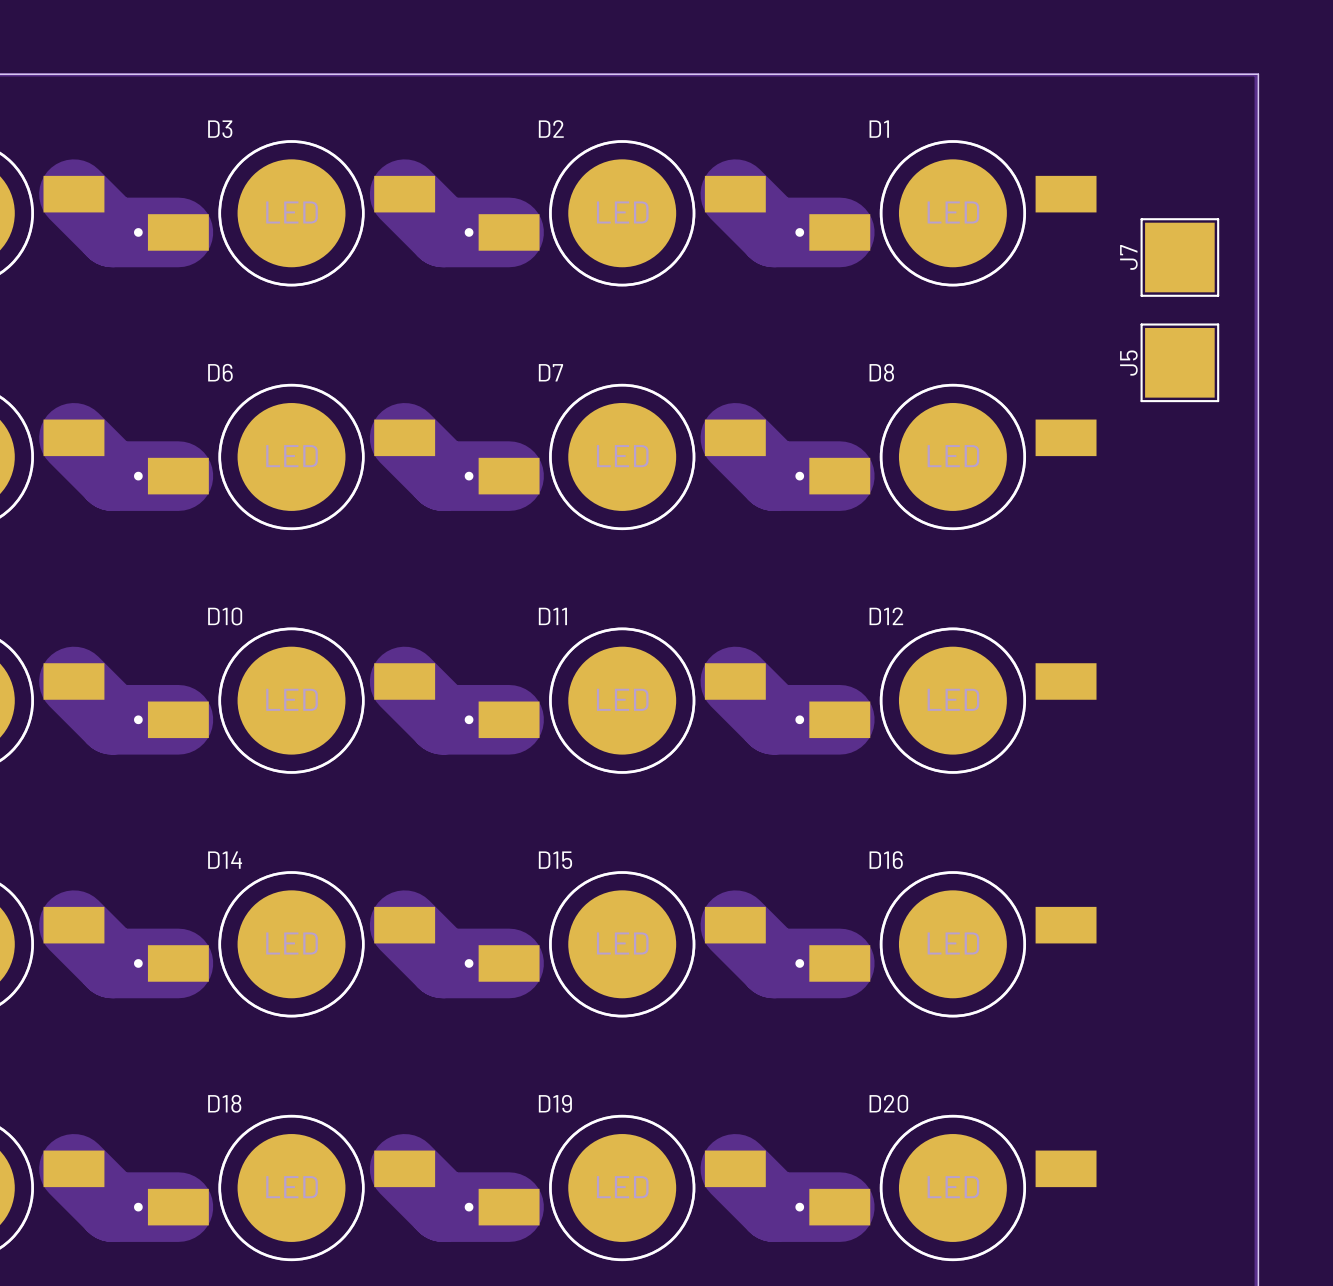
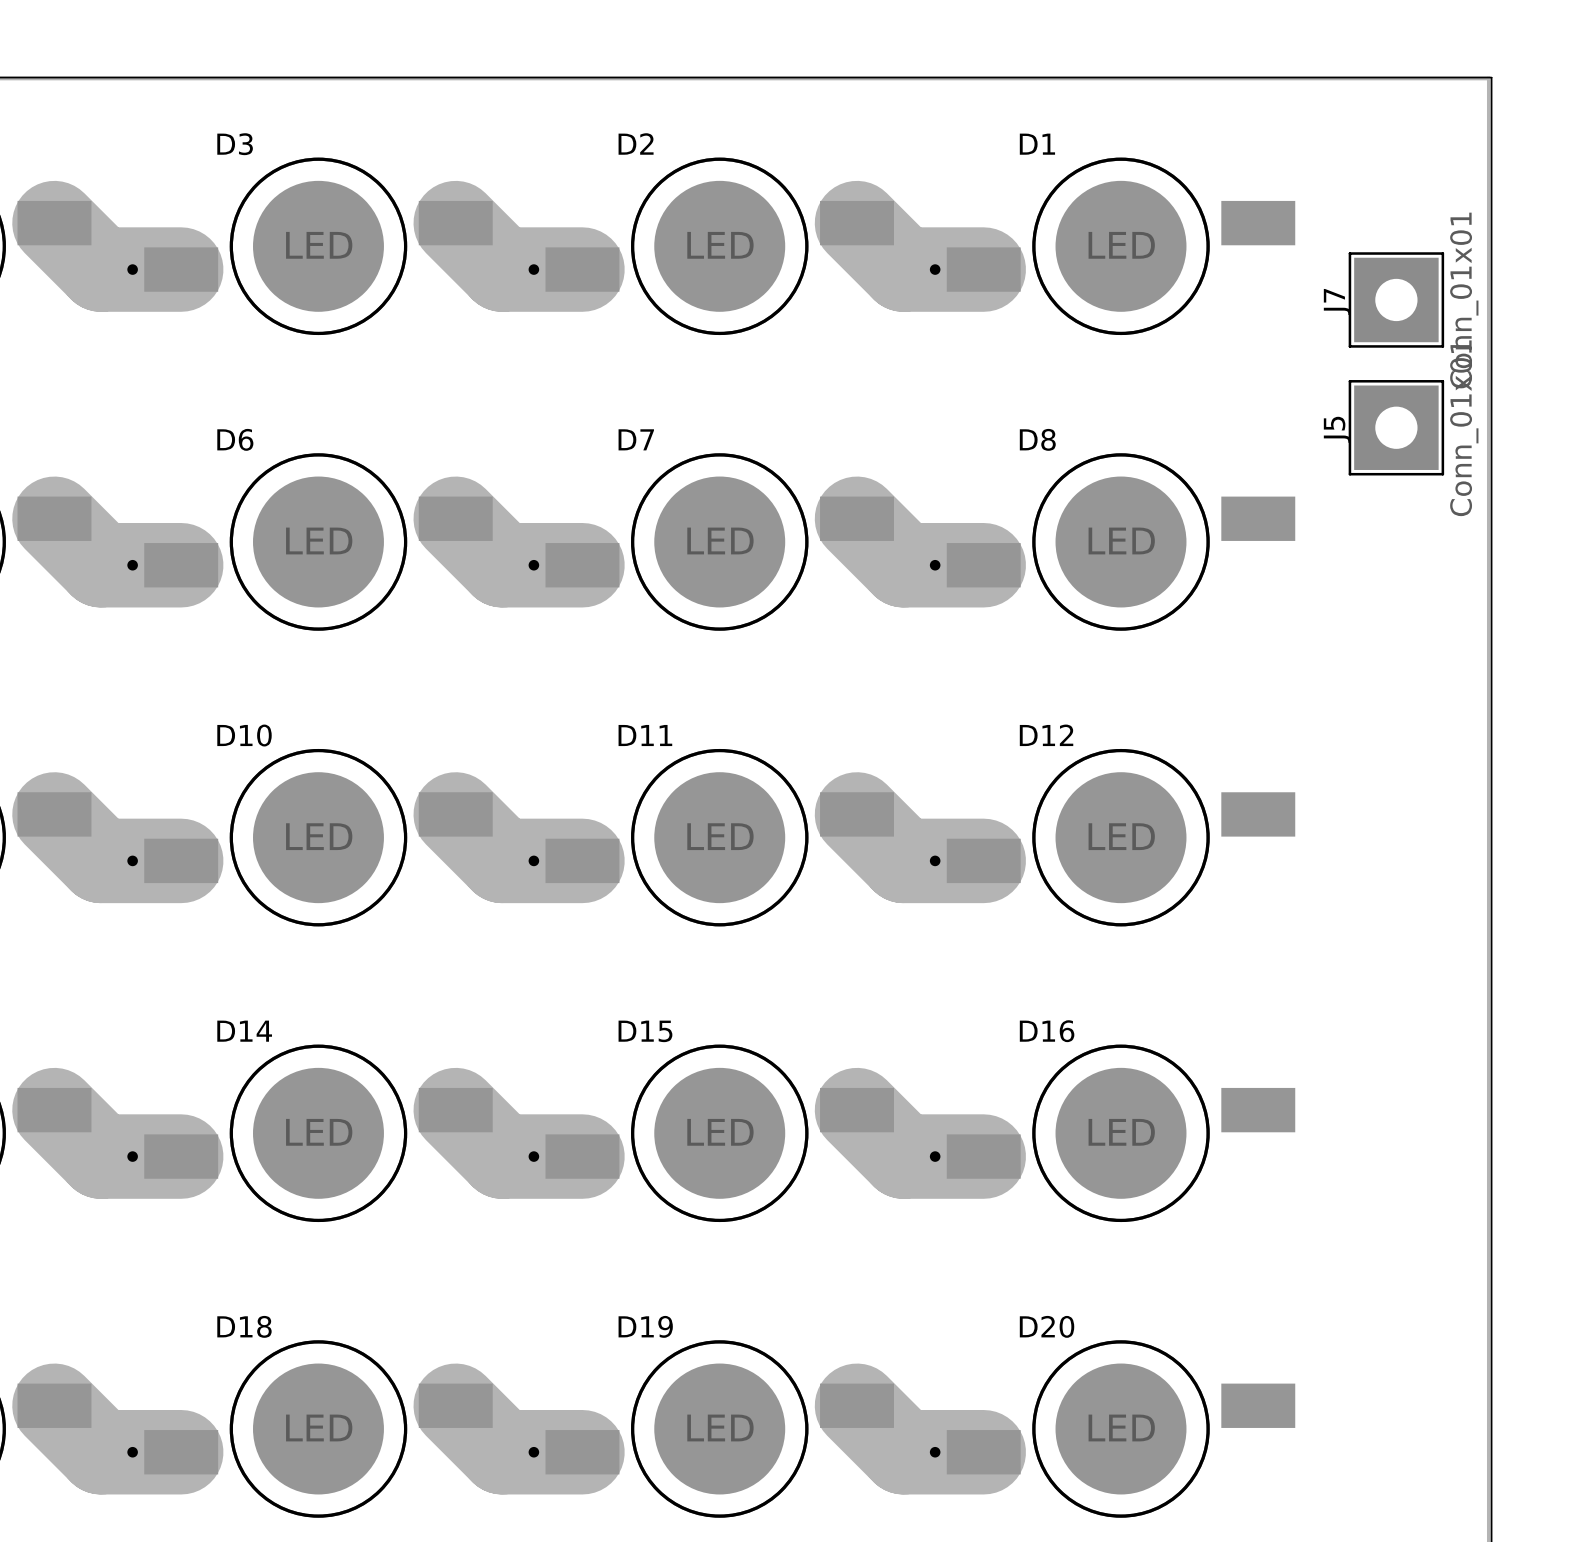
J7 footprint: [1140, 218, 1220, 297] -> [1348, 252, 1445, 348]
J7 value: none -> Conn_01x01 (1464, 300)
J5 footprint: [1140, 323, 1220, 403] -> [1348, 380, 1445, 476]
J5 value: none -> Conn_01x01 (1464, 428)

